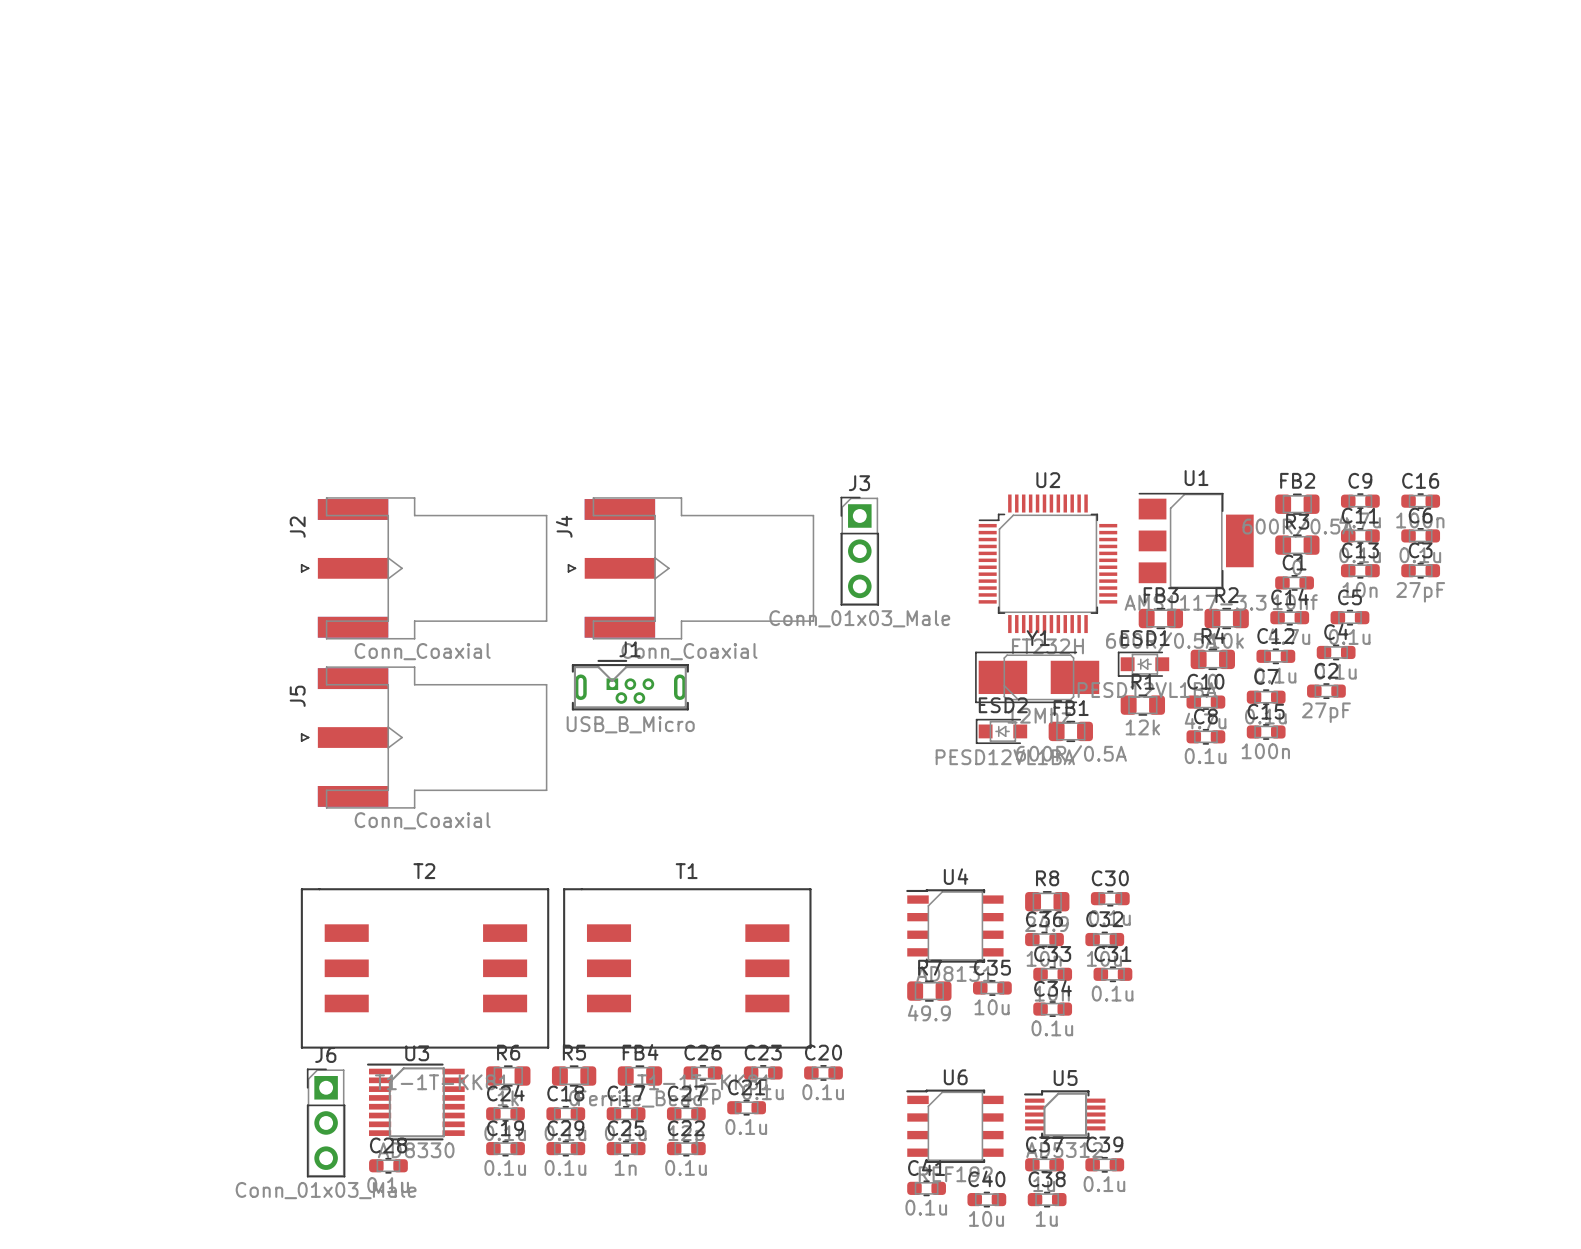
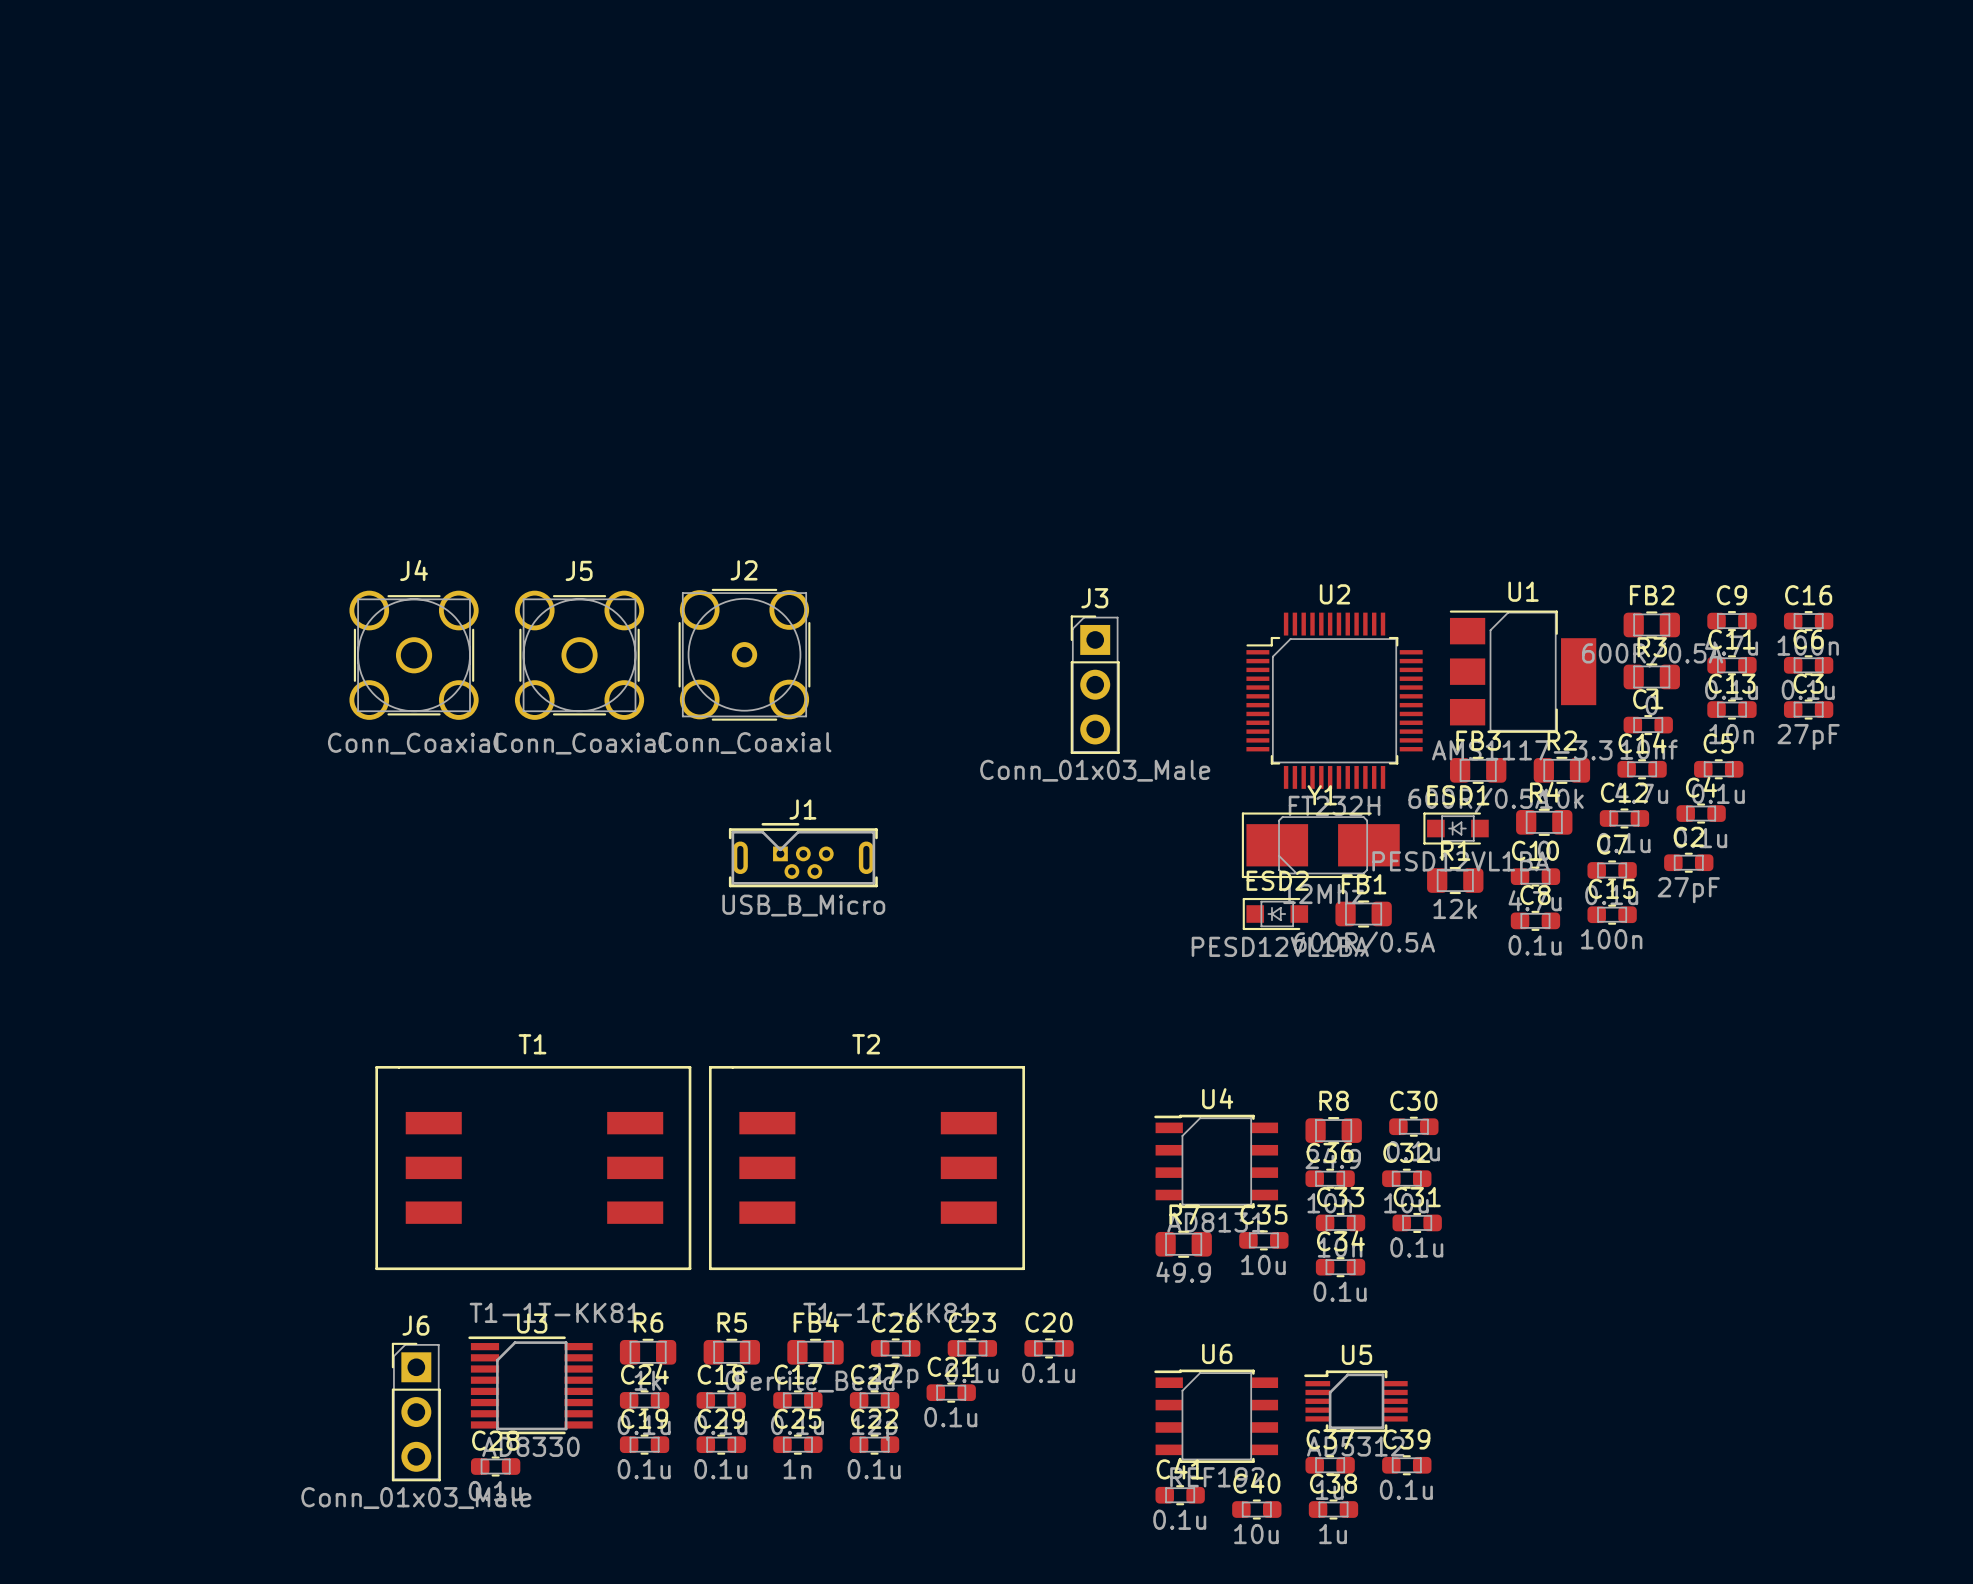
J2 footprint: [300, 497, 548, 640] -> [678, 588, 811, 721]
J4 footprint: [567, 497, 815, 640] -> [349, 590, 479, 720]
J4 name position: J4 (564, 526) -> J4 (414, 570)
J2 name position: J2 (297, 527) -> J2 (744, 570)
J5 footprint: [300, 666, 548, 809] -> [514, 590, 645, 720]
J5 name position: J5 (297, 696) -> J5 (579, 570)
T2 position: (425, 968) -> (866, 1168)
T1 position: (687, 968) -> (533, 1168)

